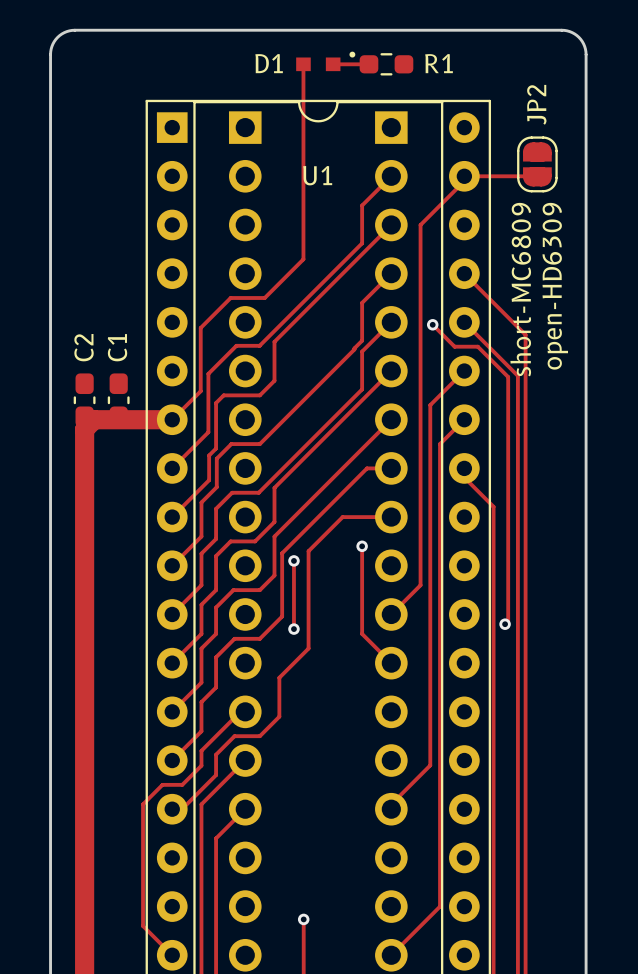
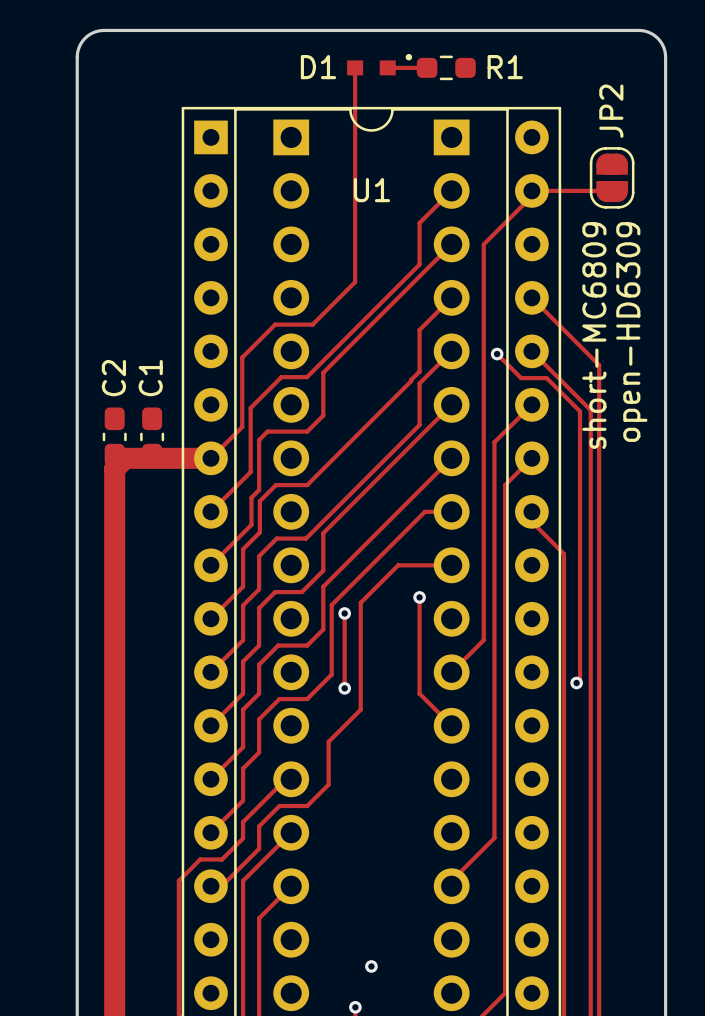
via: none -> (371, 966)

